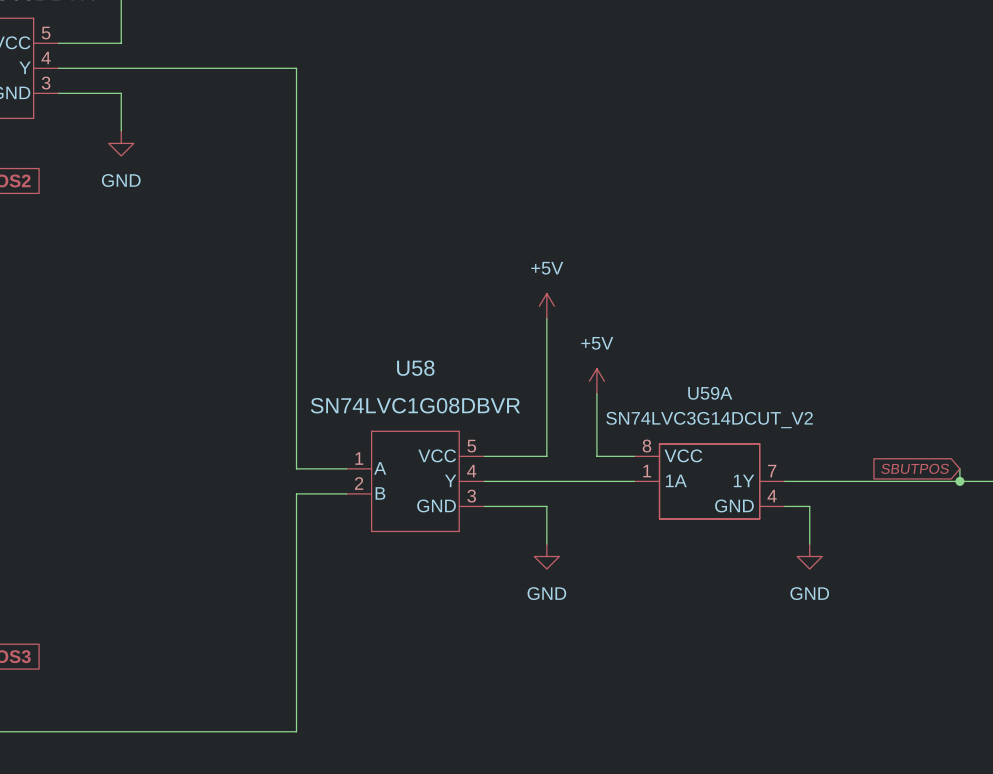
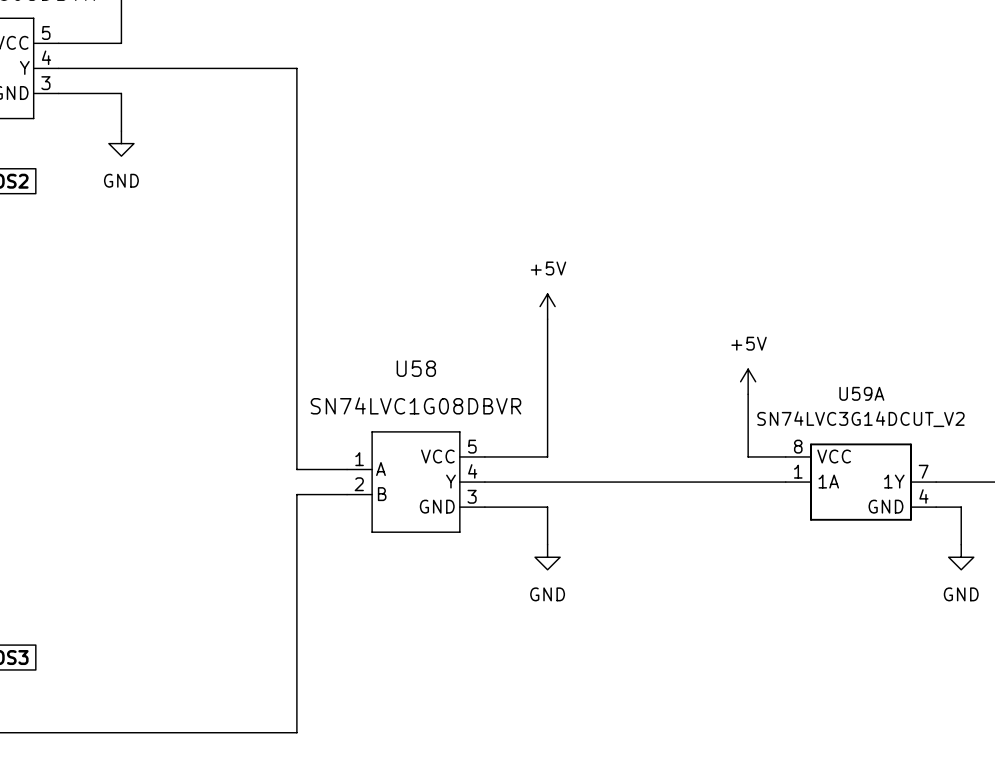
power symbol position: +5V (596, 381) -> +5V (748, 381)
wire: (596, 393) (596, 456) (634, 456) -> (748, 394) (748, 456) (785, 456)
global label: SBUTPOS (915, 468) -> none
wire: (959, 468) (959, 481) -> none
U59A position: (709, 481) -> (860, 482)
wire: (784, 481) (934, 481) -> (785, 482) (635, 482)
junction: (959, 481) -> none
wire: (784, 506) (809, 506) (809, 543) -> (936, 507) (961, 507) (961, 544)
power symbol position: GND (809, 556) -> GND (961, 557)

